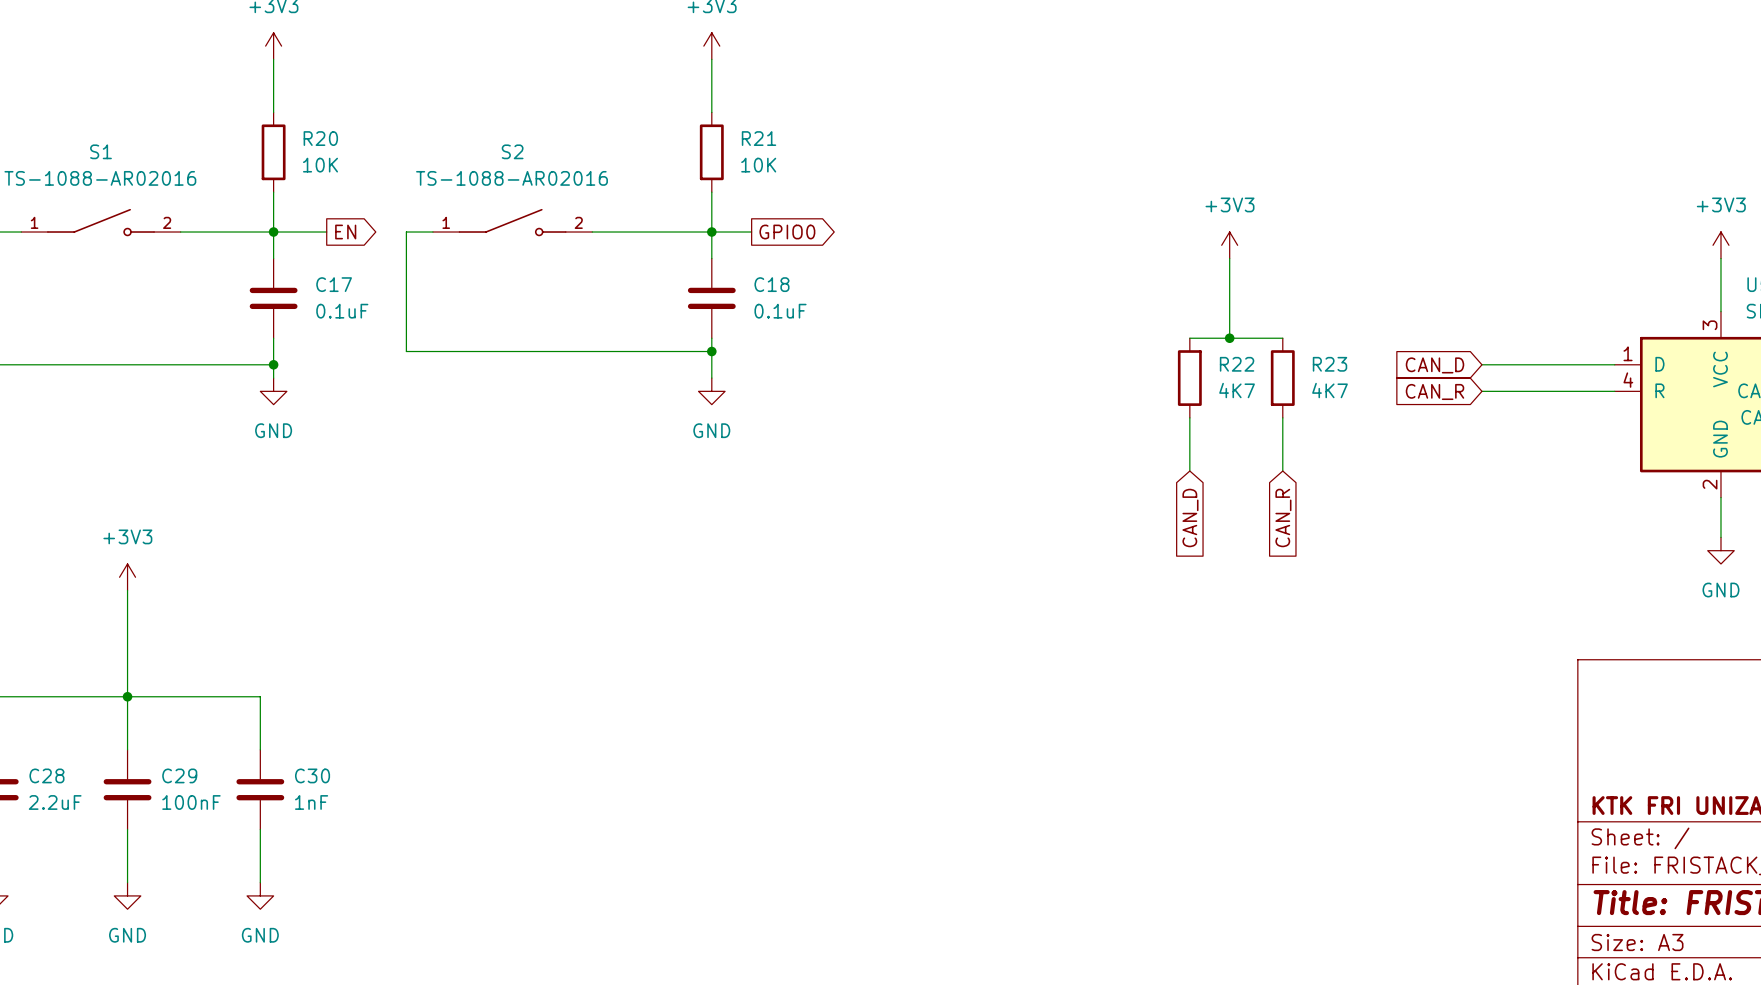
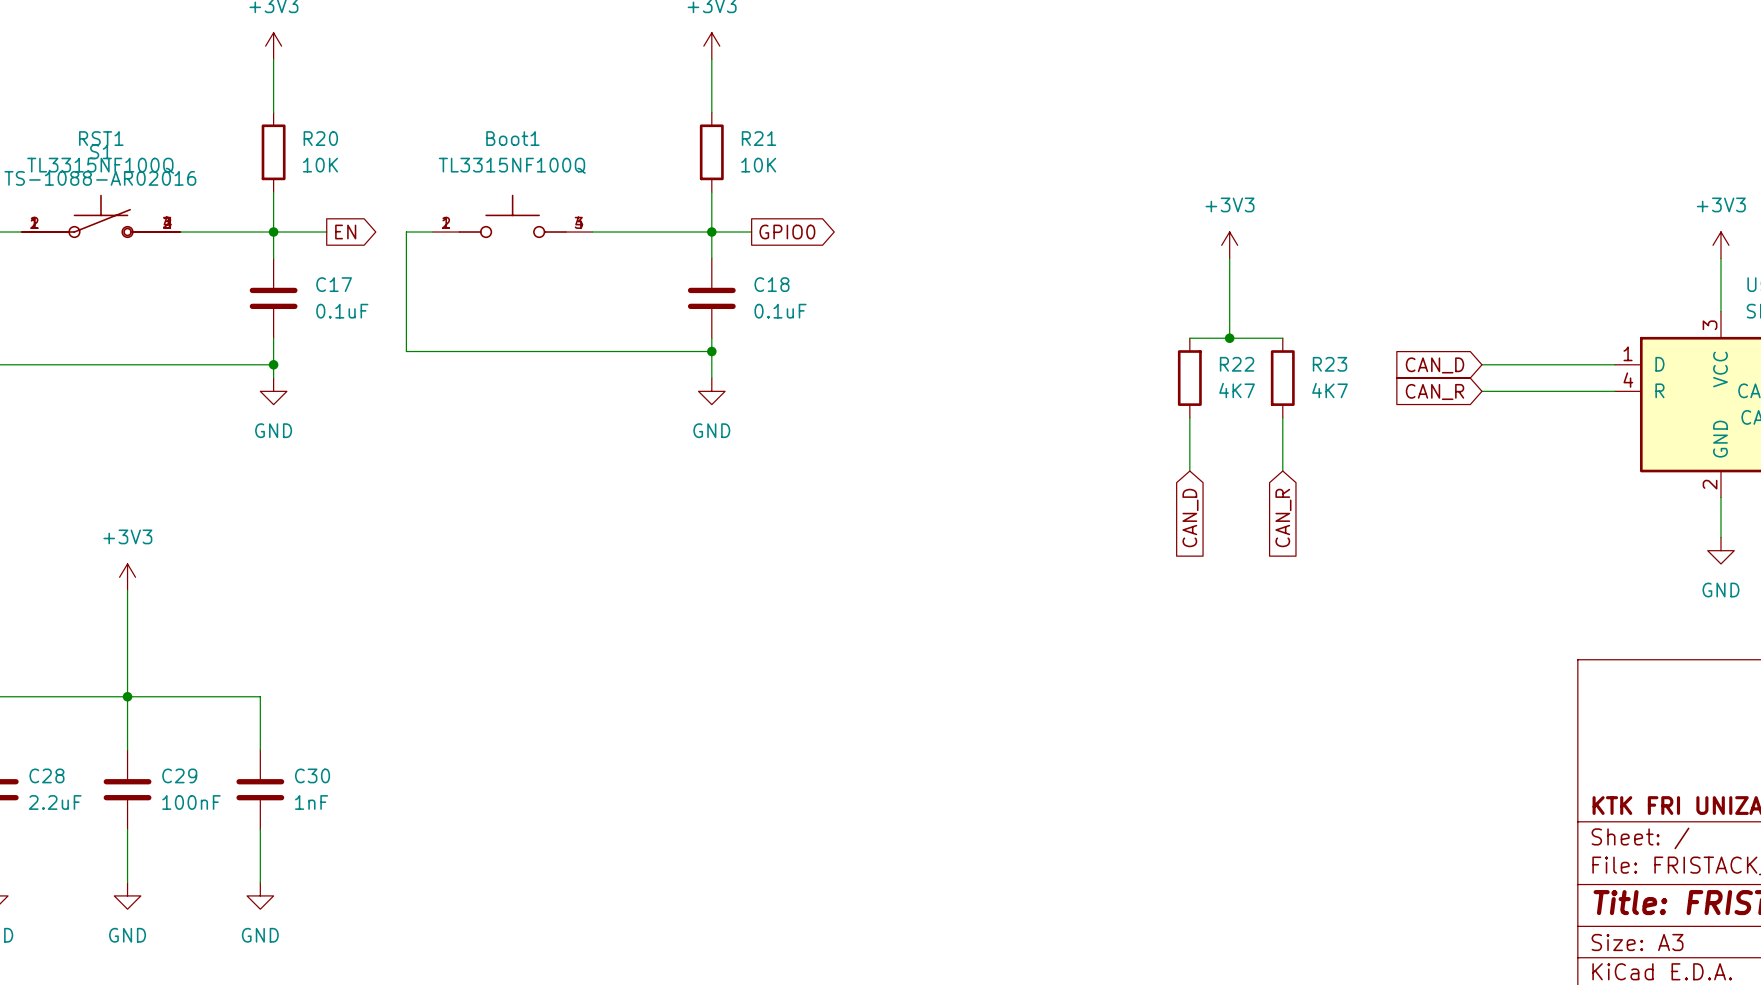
RST1: none -> TL3315NF100Q (100, 216)
Boot1: none -> TL3315NF100Q (512, 216)
S2: TS-1088-AR02016 (512, 222) -> none

